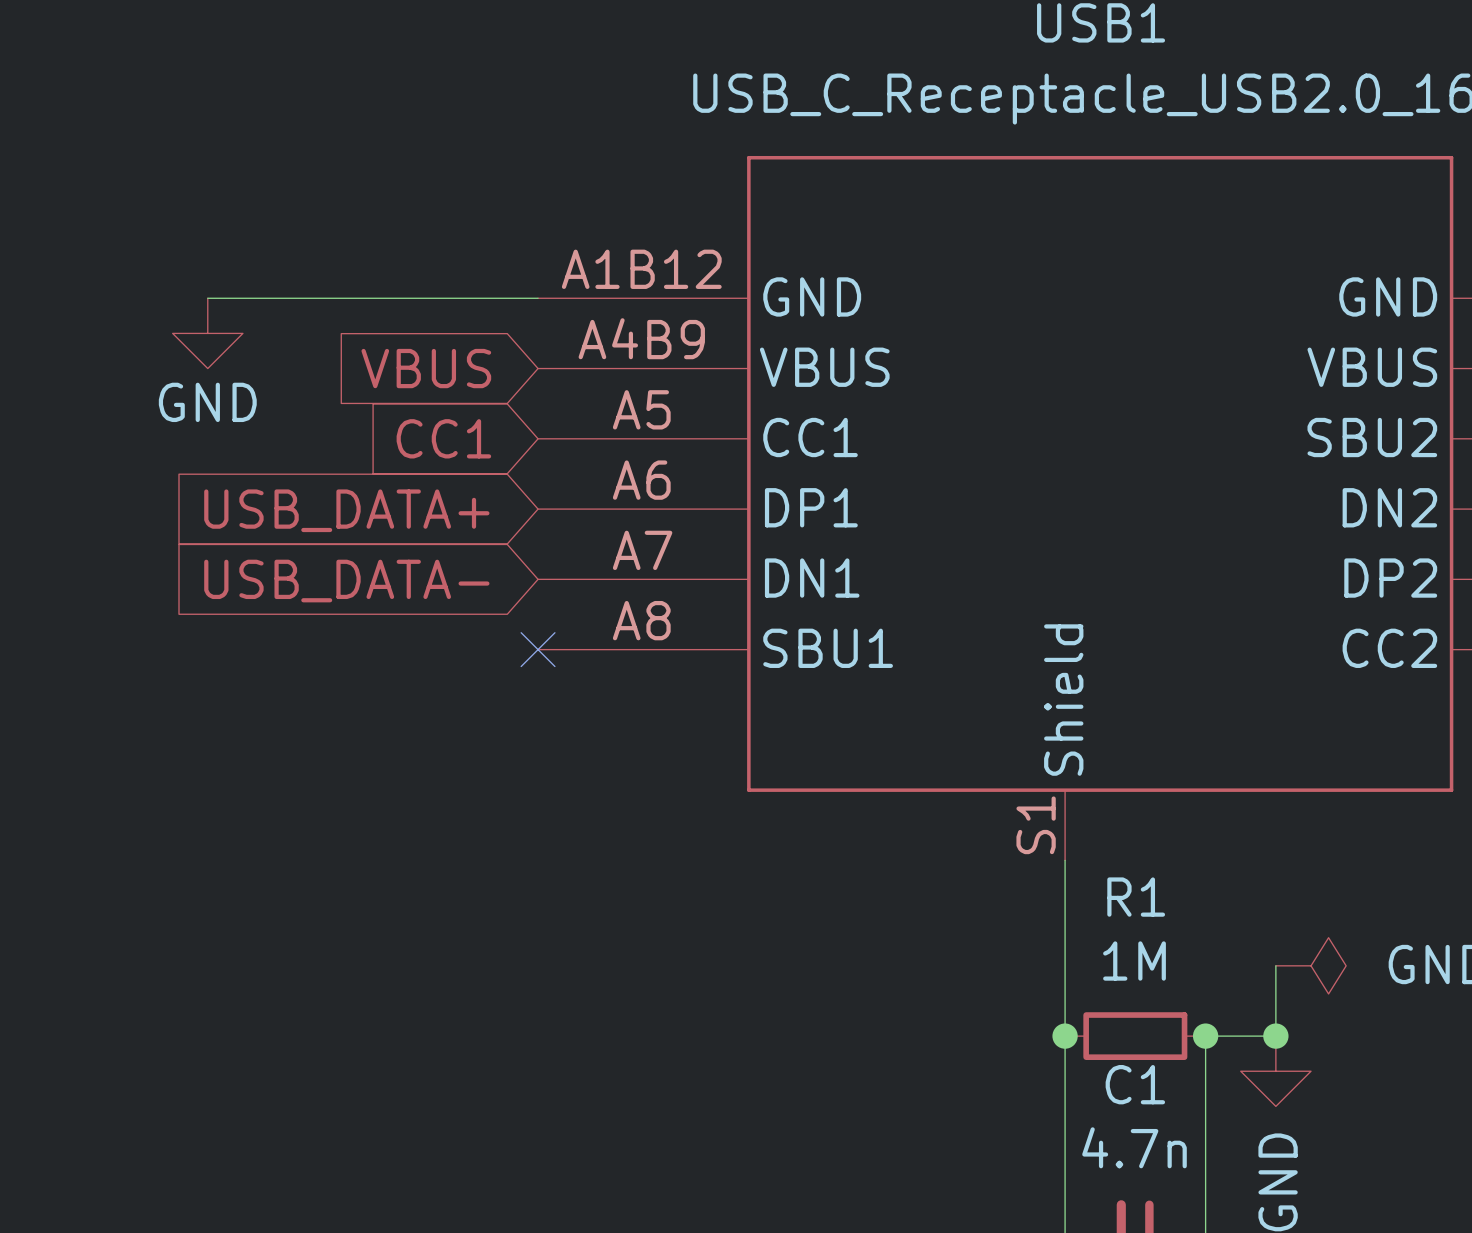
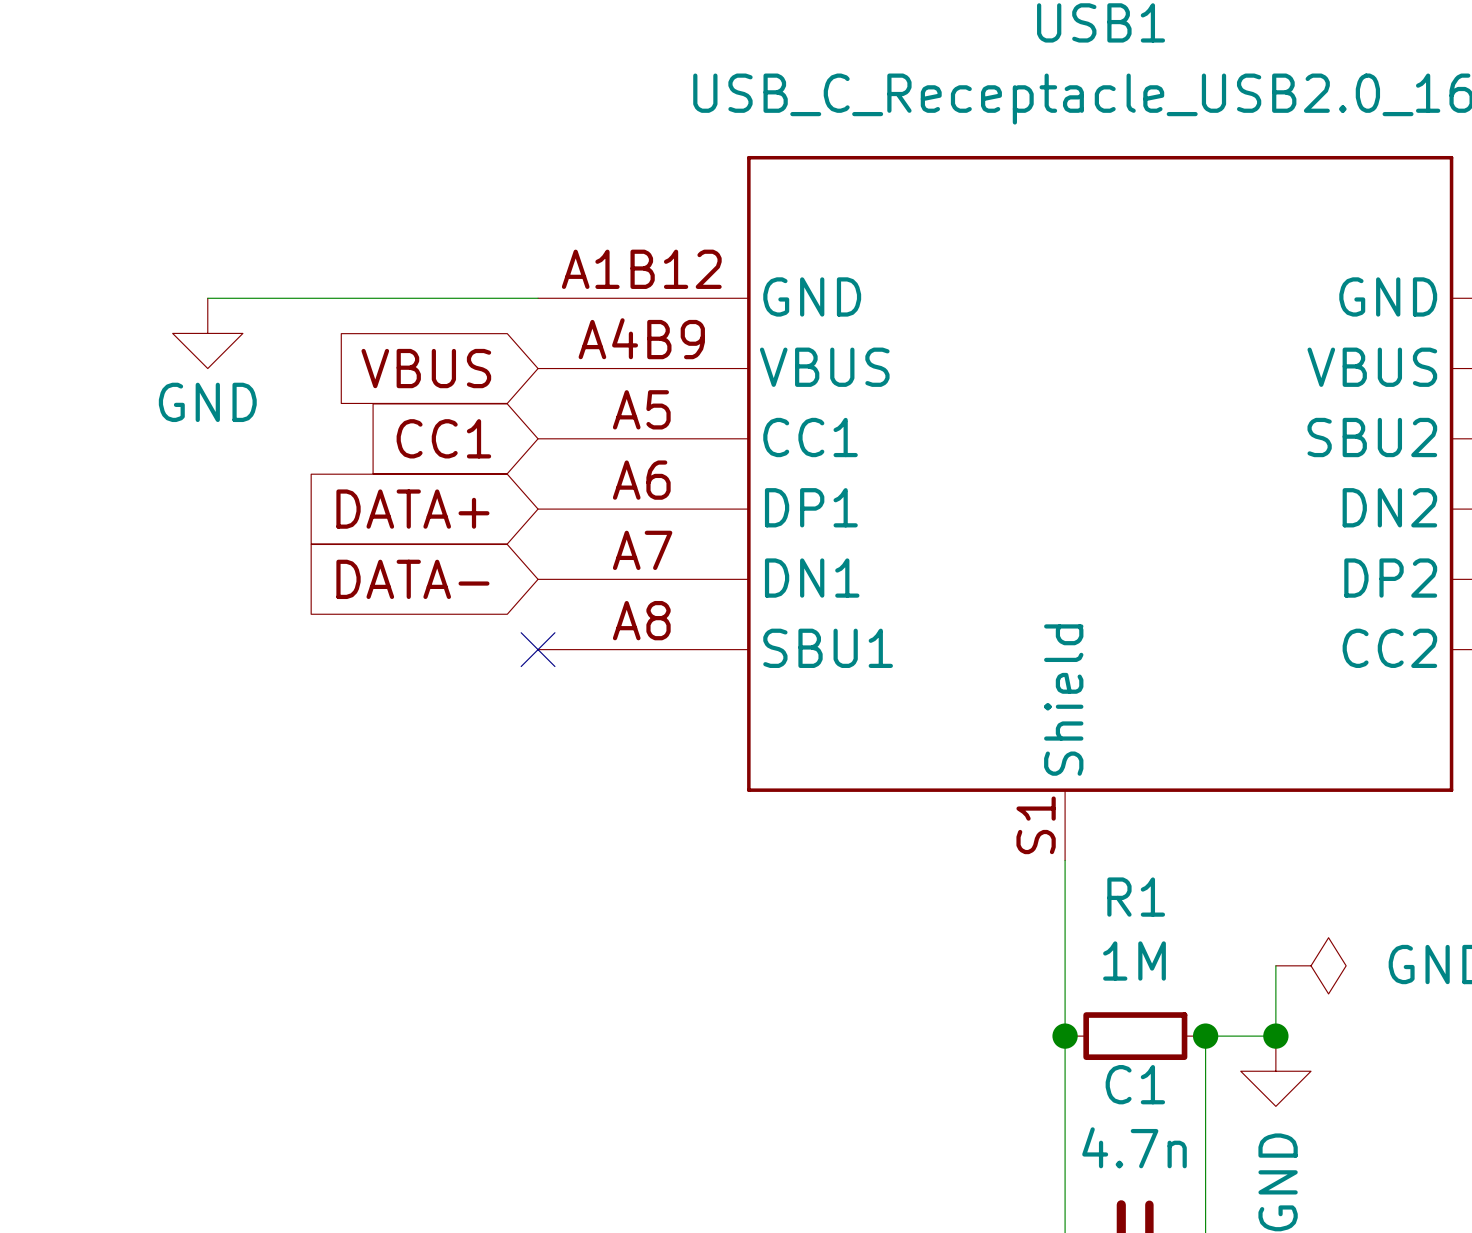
global label: USB_DATA+ (346, 510) -> DATA+ (412, 509)
global label: USB_DATA- (346, 581) -> DATA- (412, 579)

